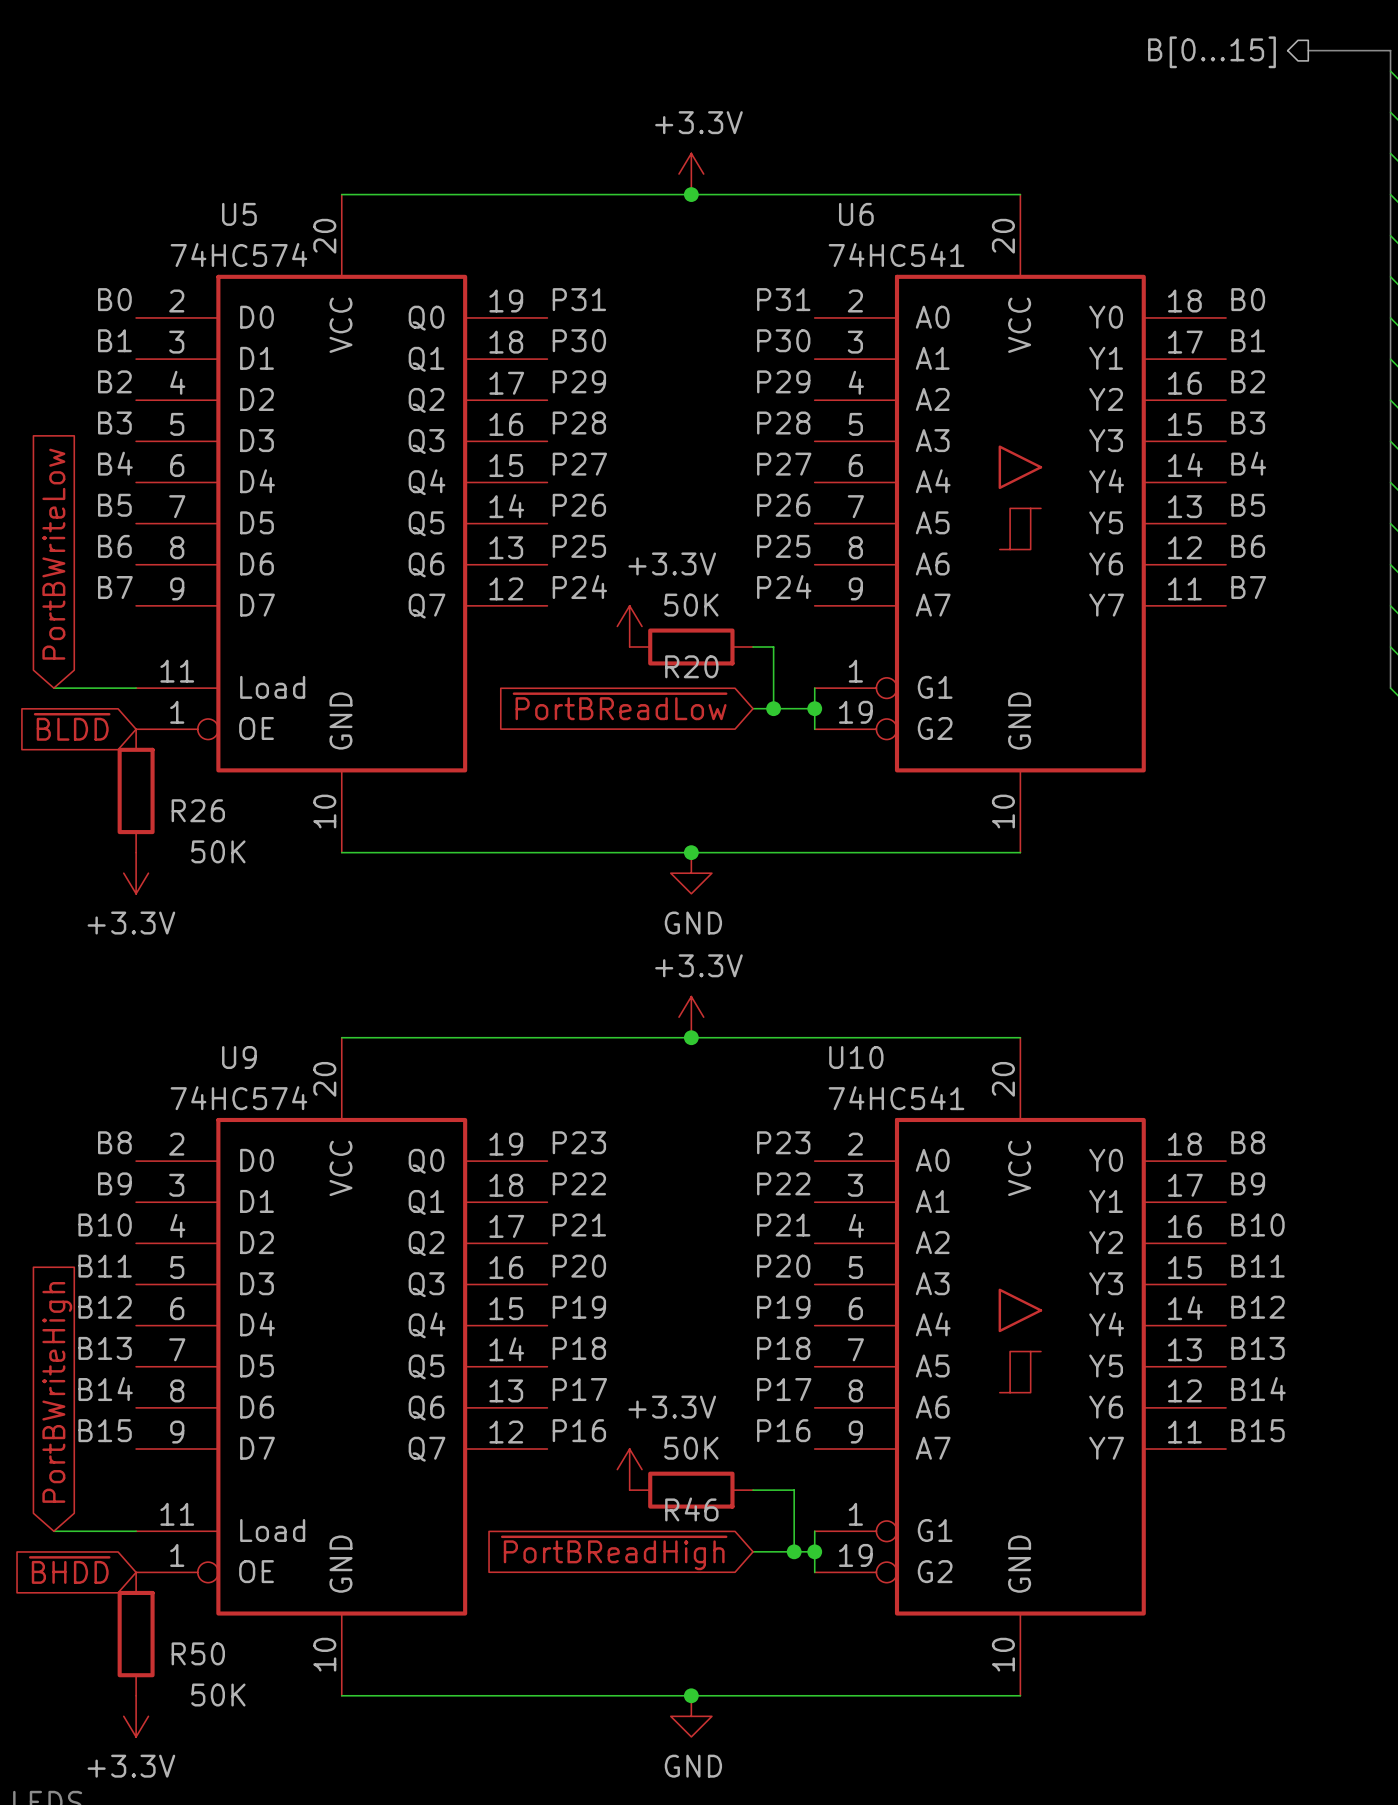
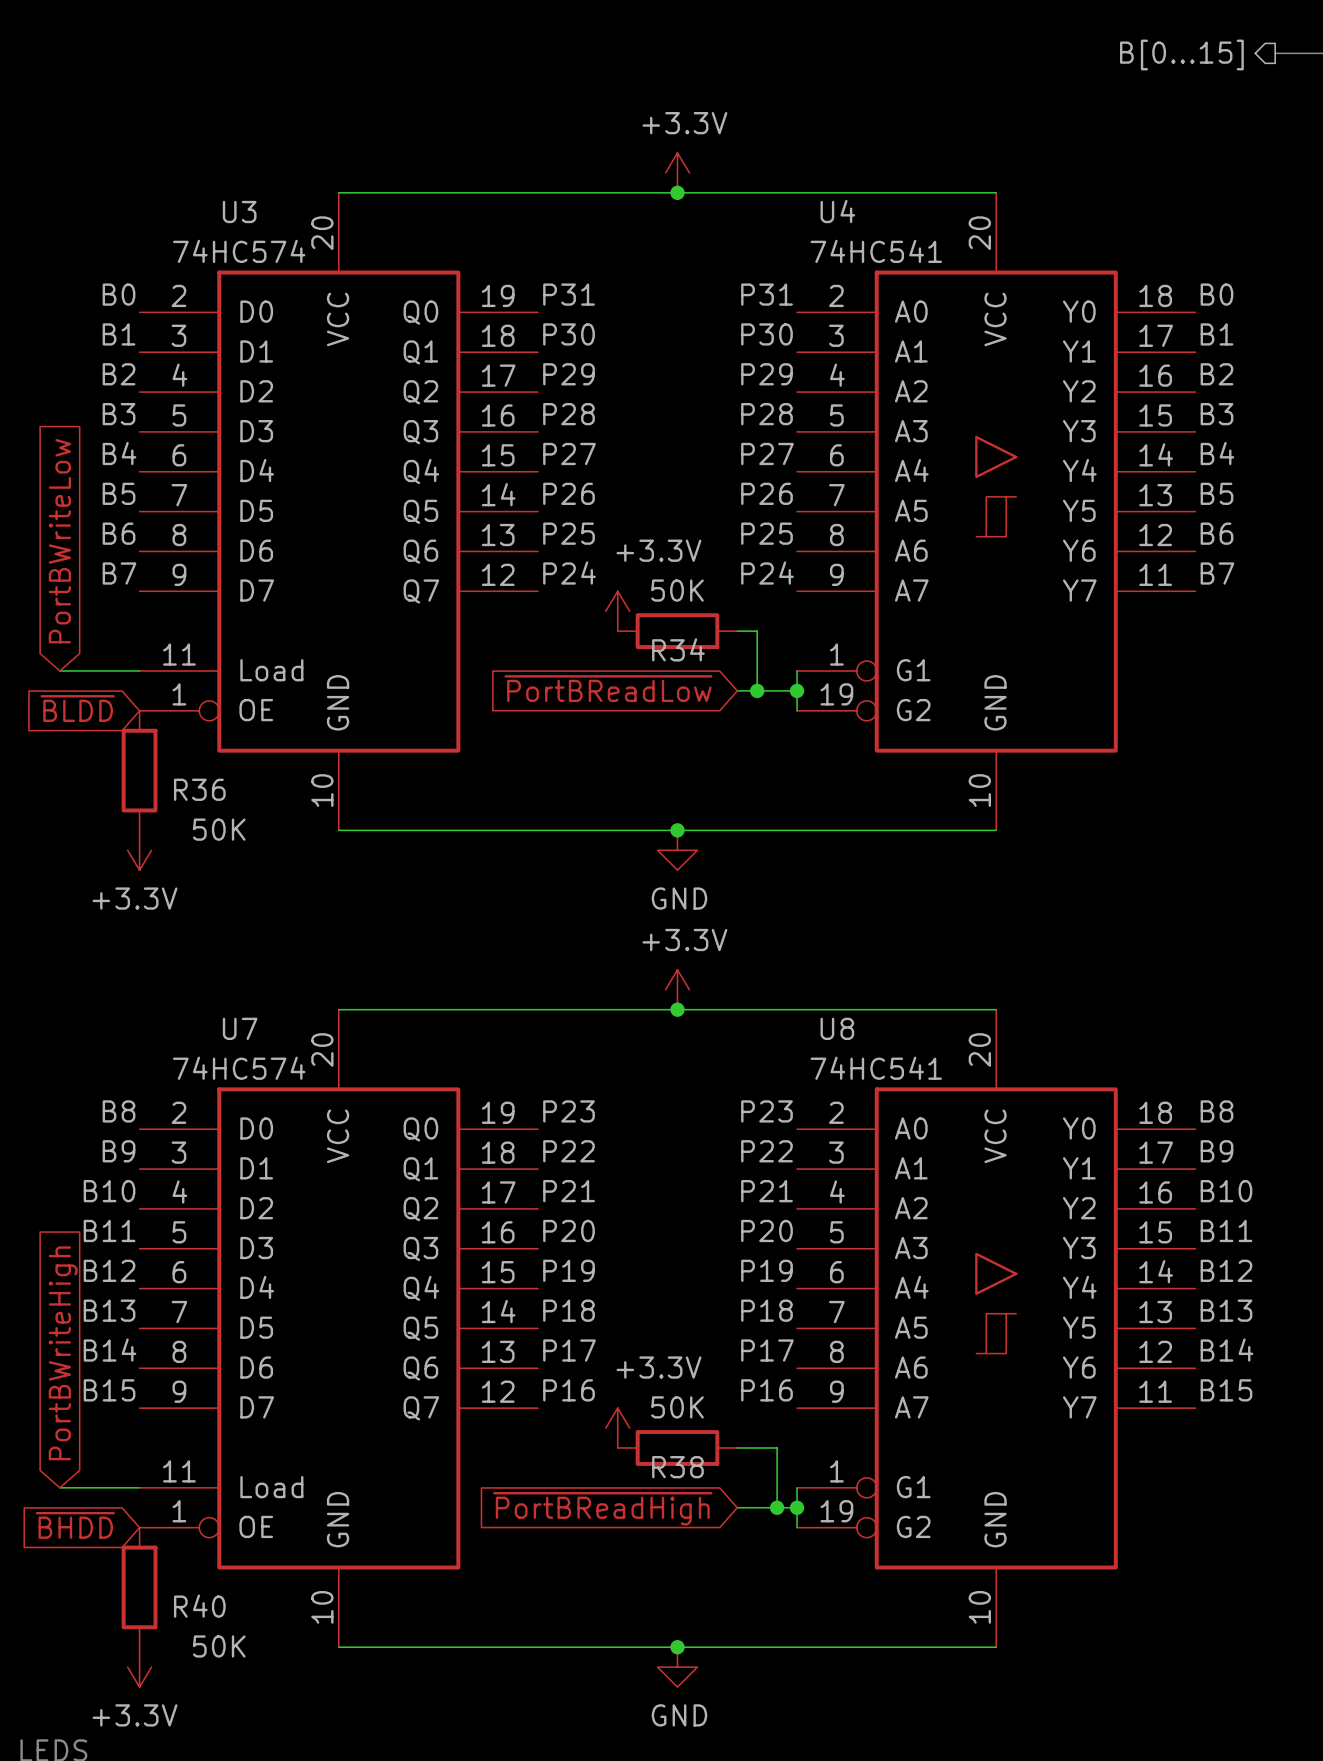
U5 name: U5 (239, 214) -> U3 (239, 212)
U6 name: U6 (856, 214) -> U4 (837, 211)
R20 name: R20 (691, 666) -> R34 (678, 649)
R26 name: R26 (198, 810) -> R36 (199, 789)
U9 name: U9 (239, 1057) -> U7 (240, 1028)
U10 name: U10 (856, 1057) -> U8 (837, 1028)
R46 name: R46 (691, 1509) -> R38 (677, 1467)
R50 name: R50 (198, 1653) -> R40 (199, 1606)

